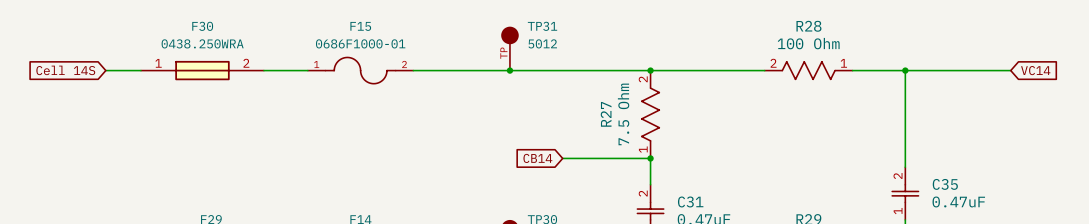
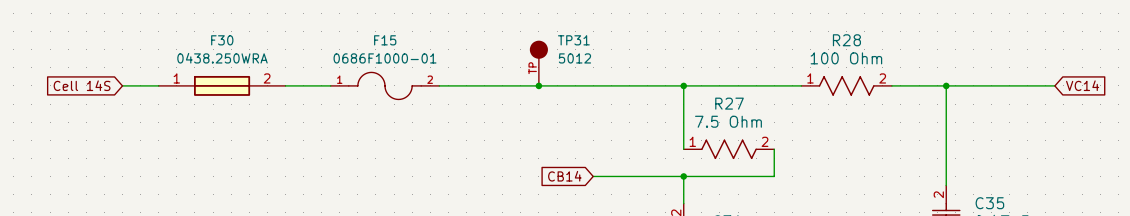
wire: none -> (683, 85) (683, 149)
R28 rotation: 0° (808, 70) -> 180° (846, 85)
R27 rotation: 0° (650, 114) -> 90° clockwise (728, 149)
wire: none -> (774, 149) (774, 176) (683, 176)

